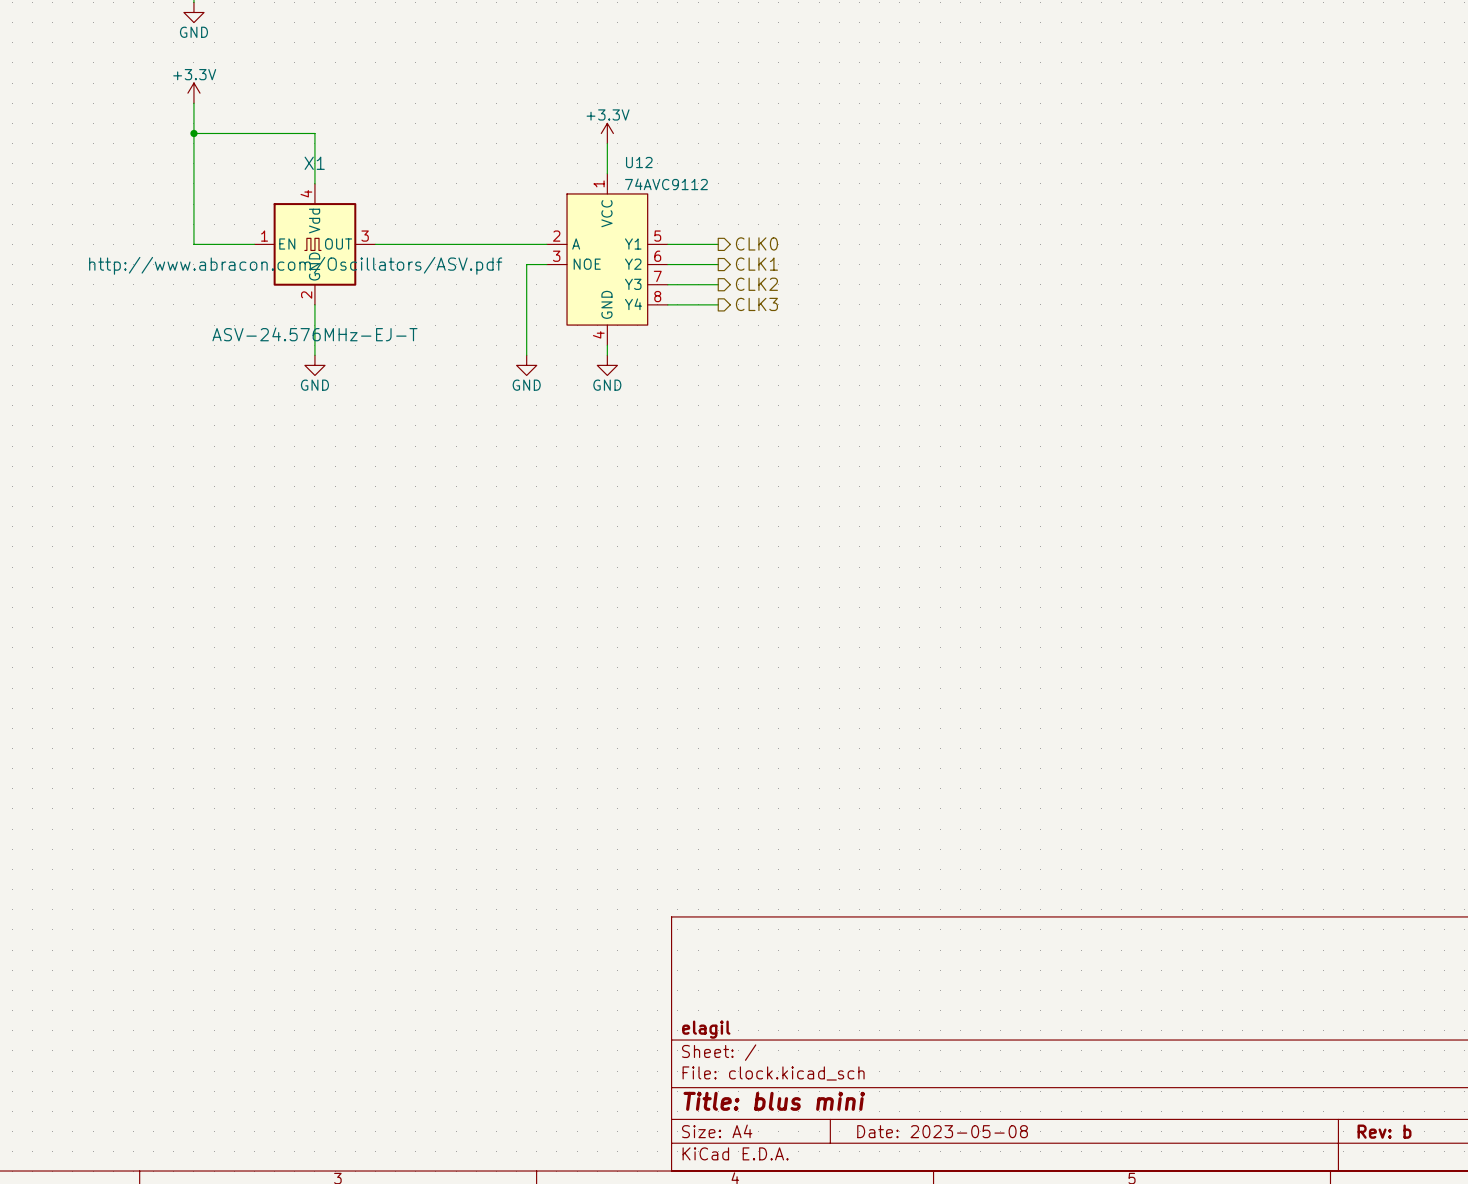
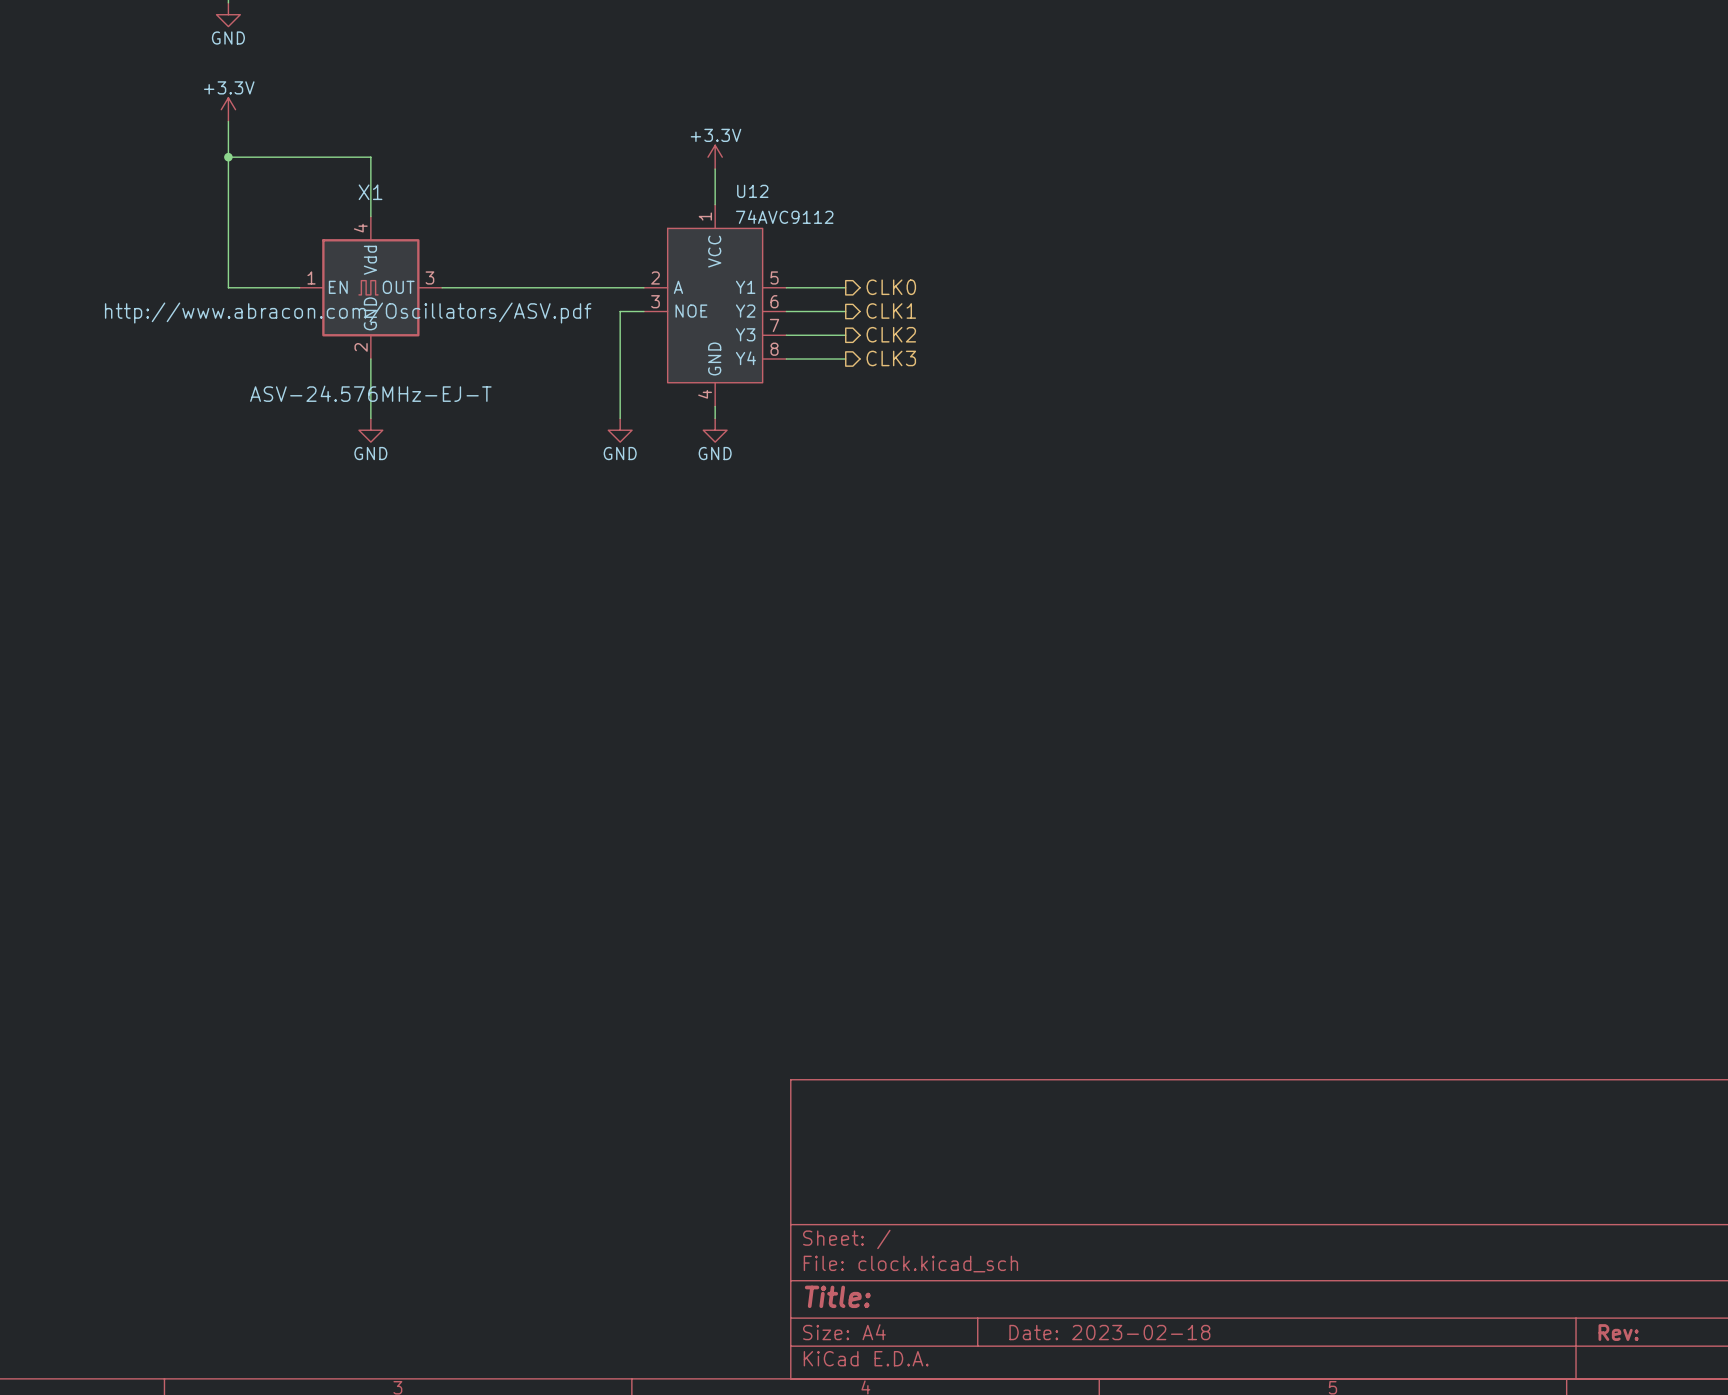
title block: elagil (706, 1029) -> none
title block: Title: blus mini (774, 1101) -> Title: (837, 1296)
title block: Date: 2023-05-08 (942, 1131) -> Date: 2023-02-18 (1109, 1332)
title block: Rev: b (1384, 1131) -> Rev: (1618, 1332)

